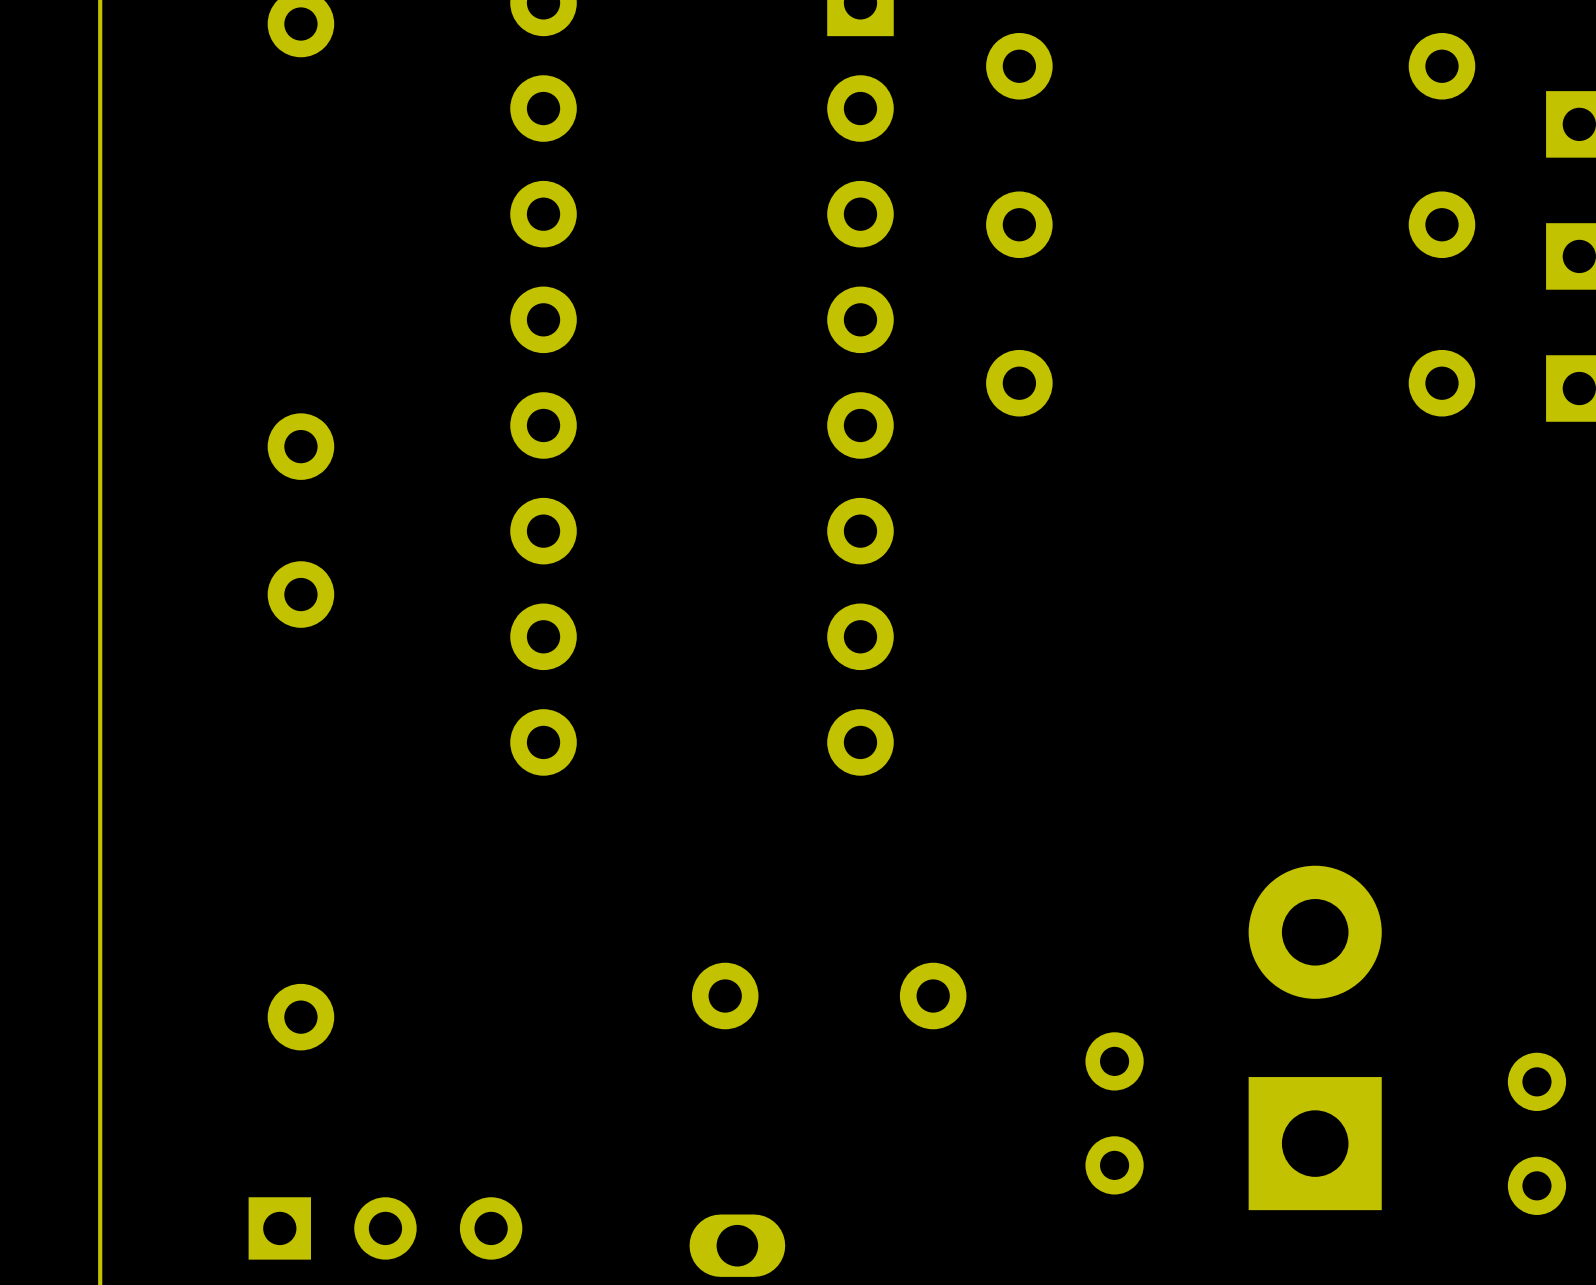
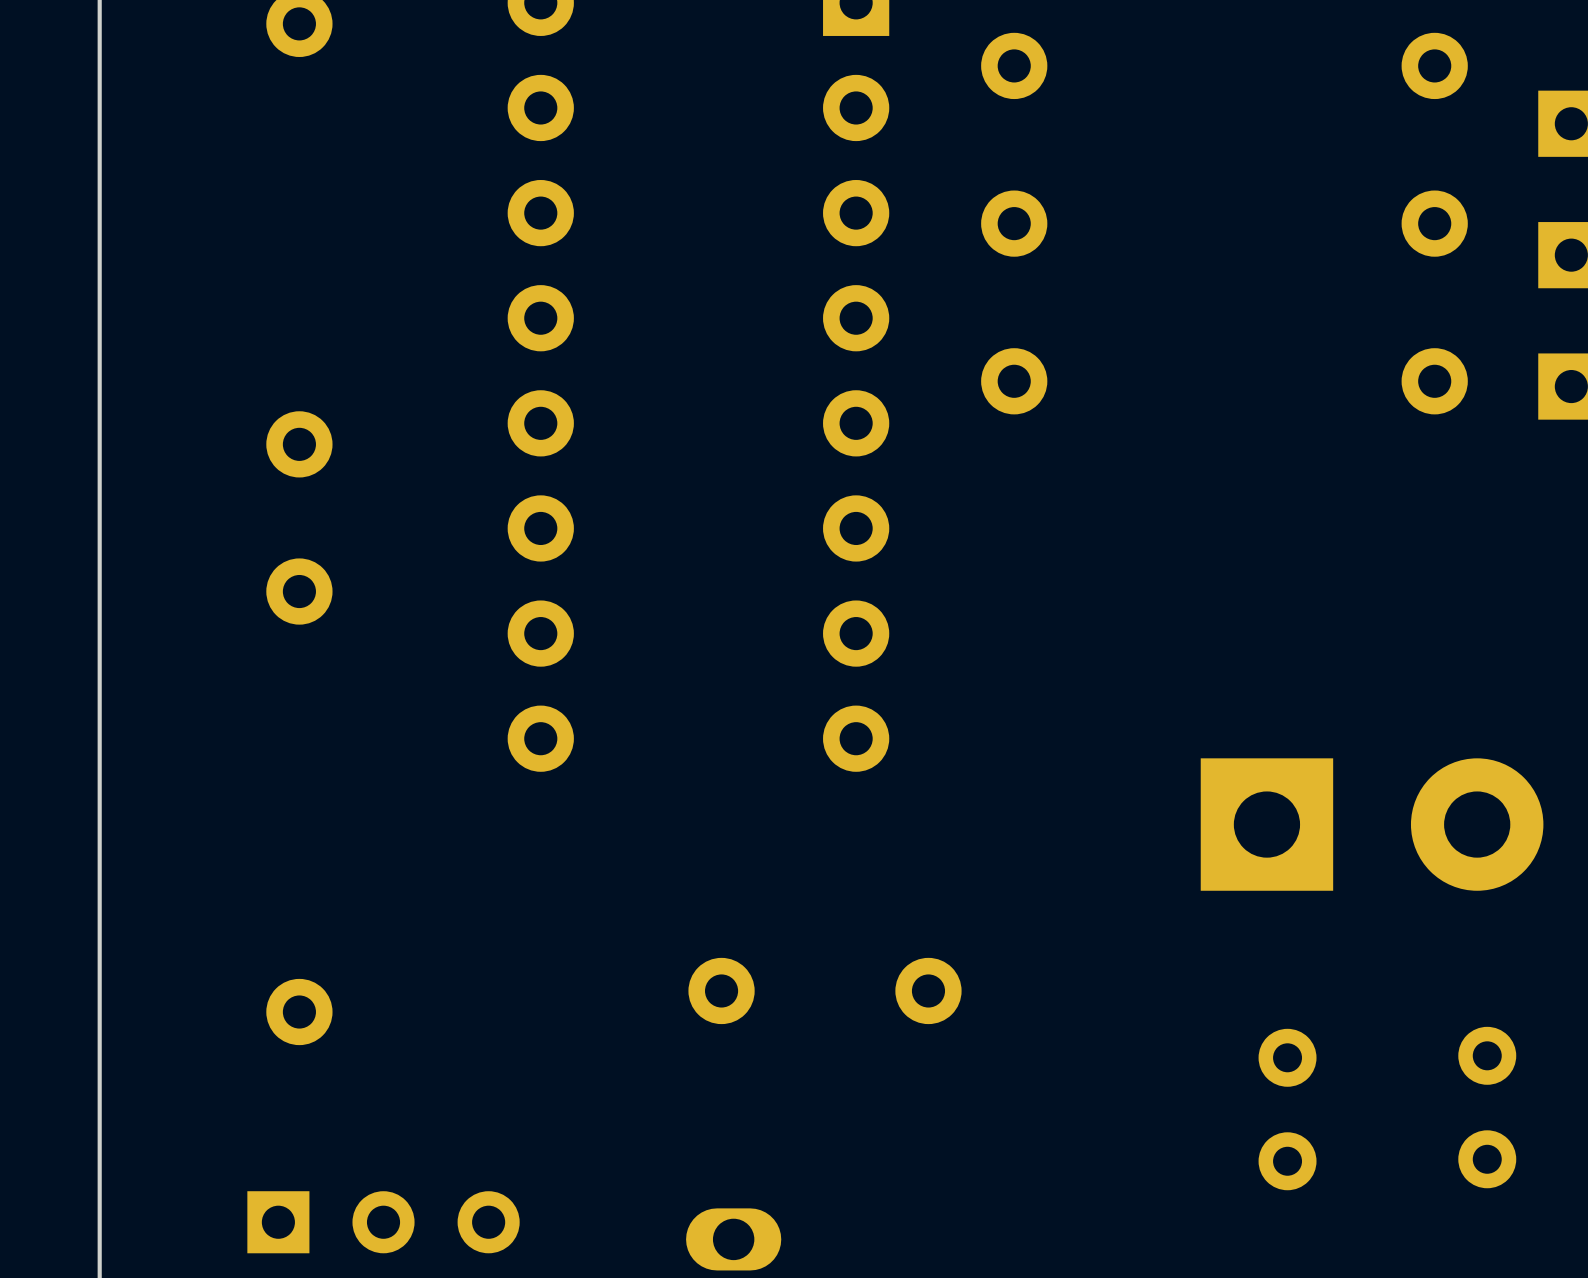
part rotation: 0° (1315, 1037) -> 90° clockwise (1372, 824)
part position: (1315, 1037) -> (1372, 824)
part: (1114, 1113) -> none
part: none -> (1287, 1109)
part position: (1536, 1133) -> (1487, 1107)

